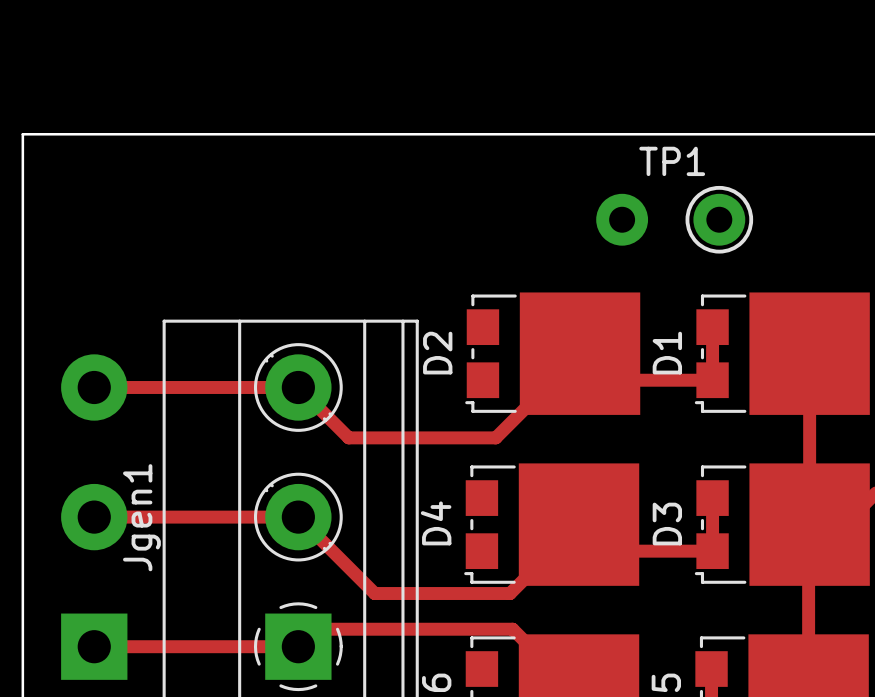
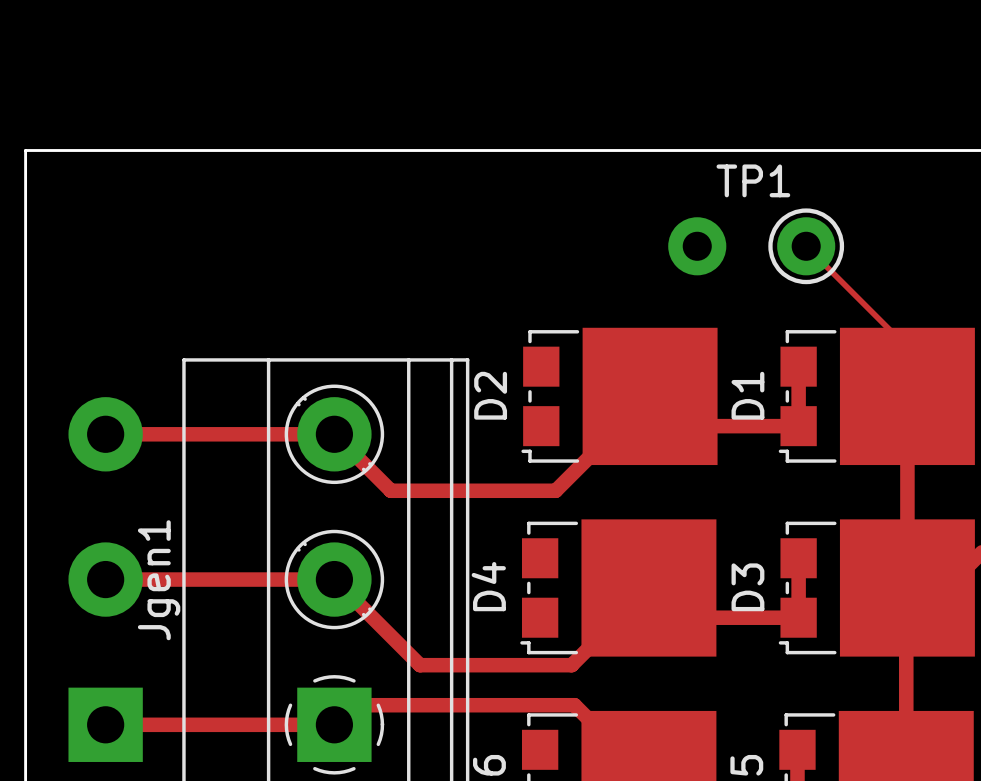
track: none -> (806, 246) (907, 347) (907, 396)

